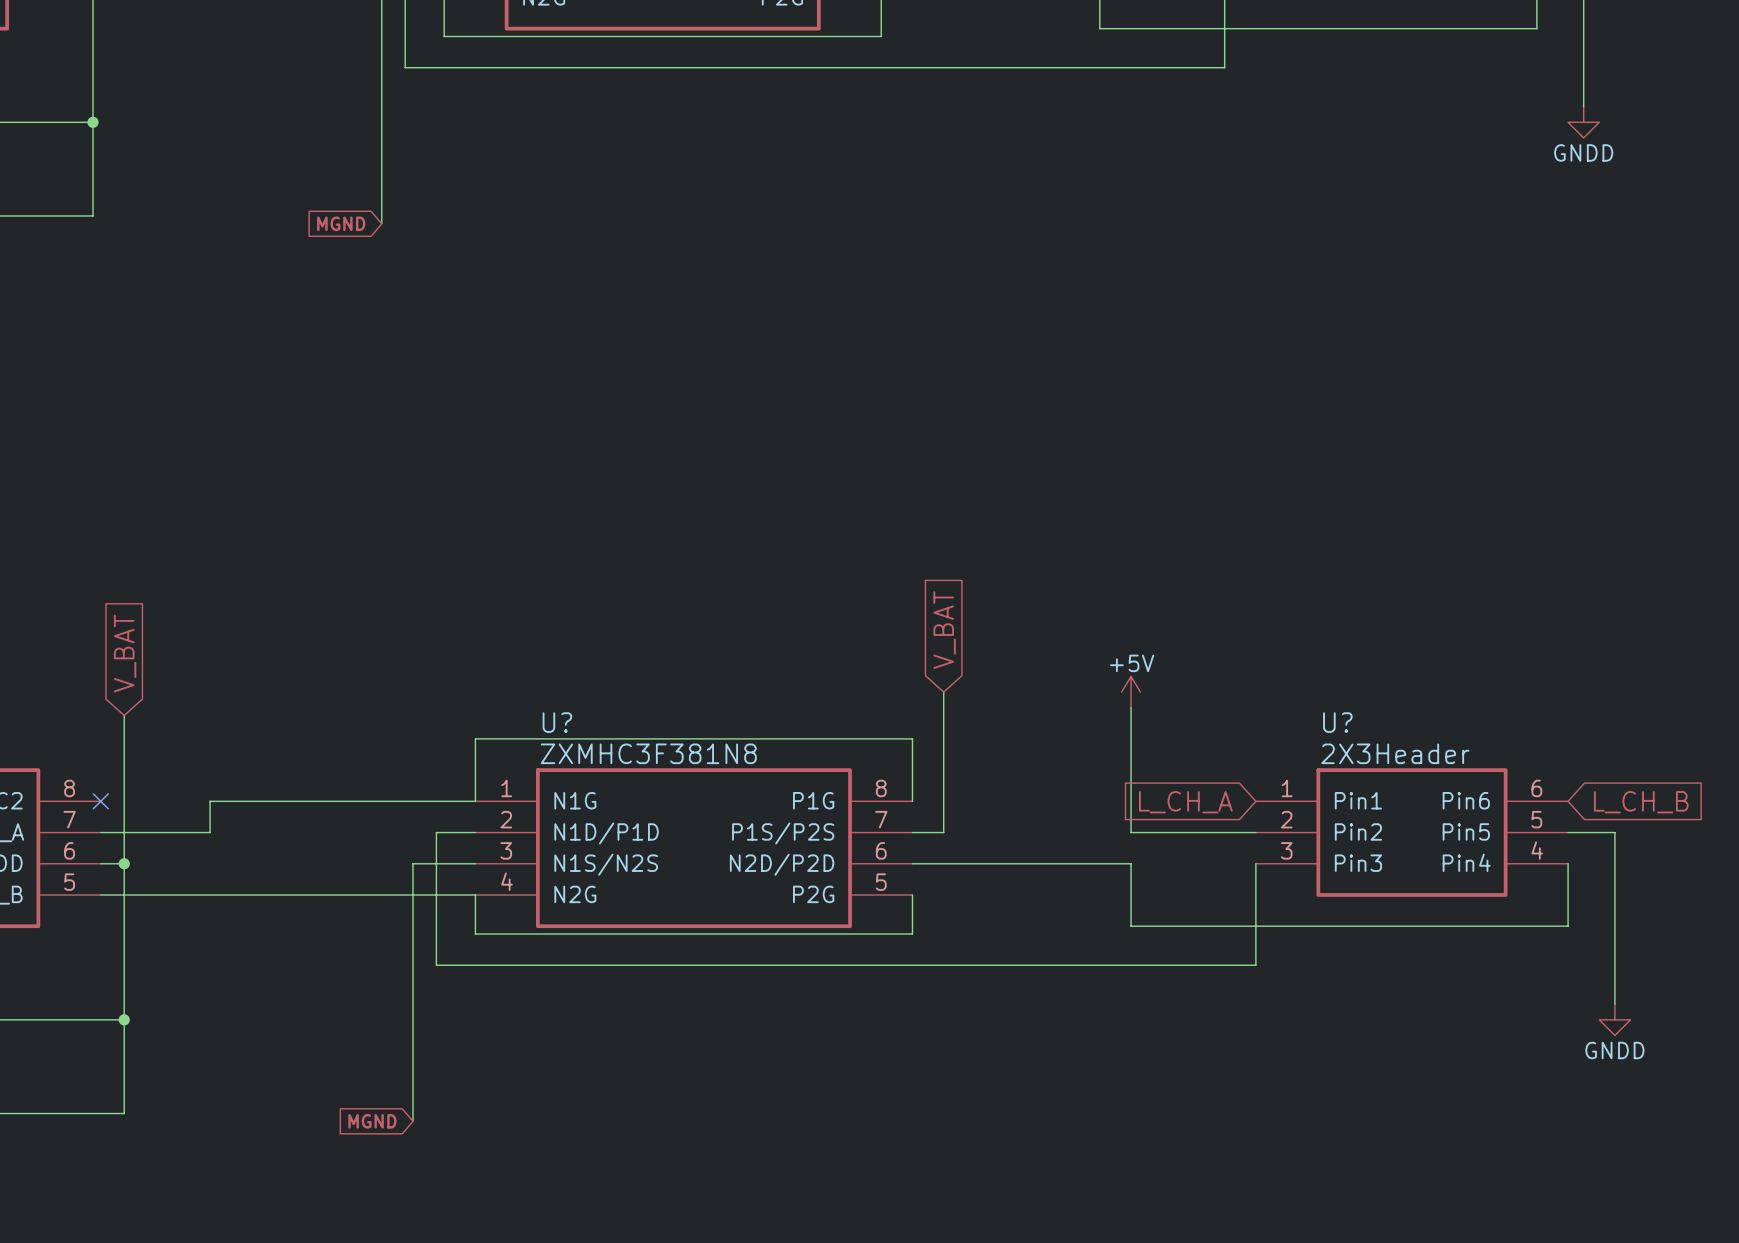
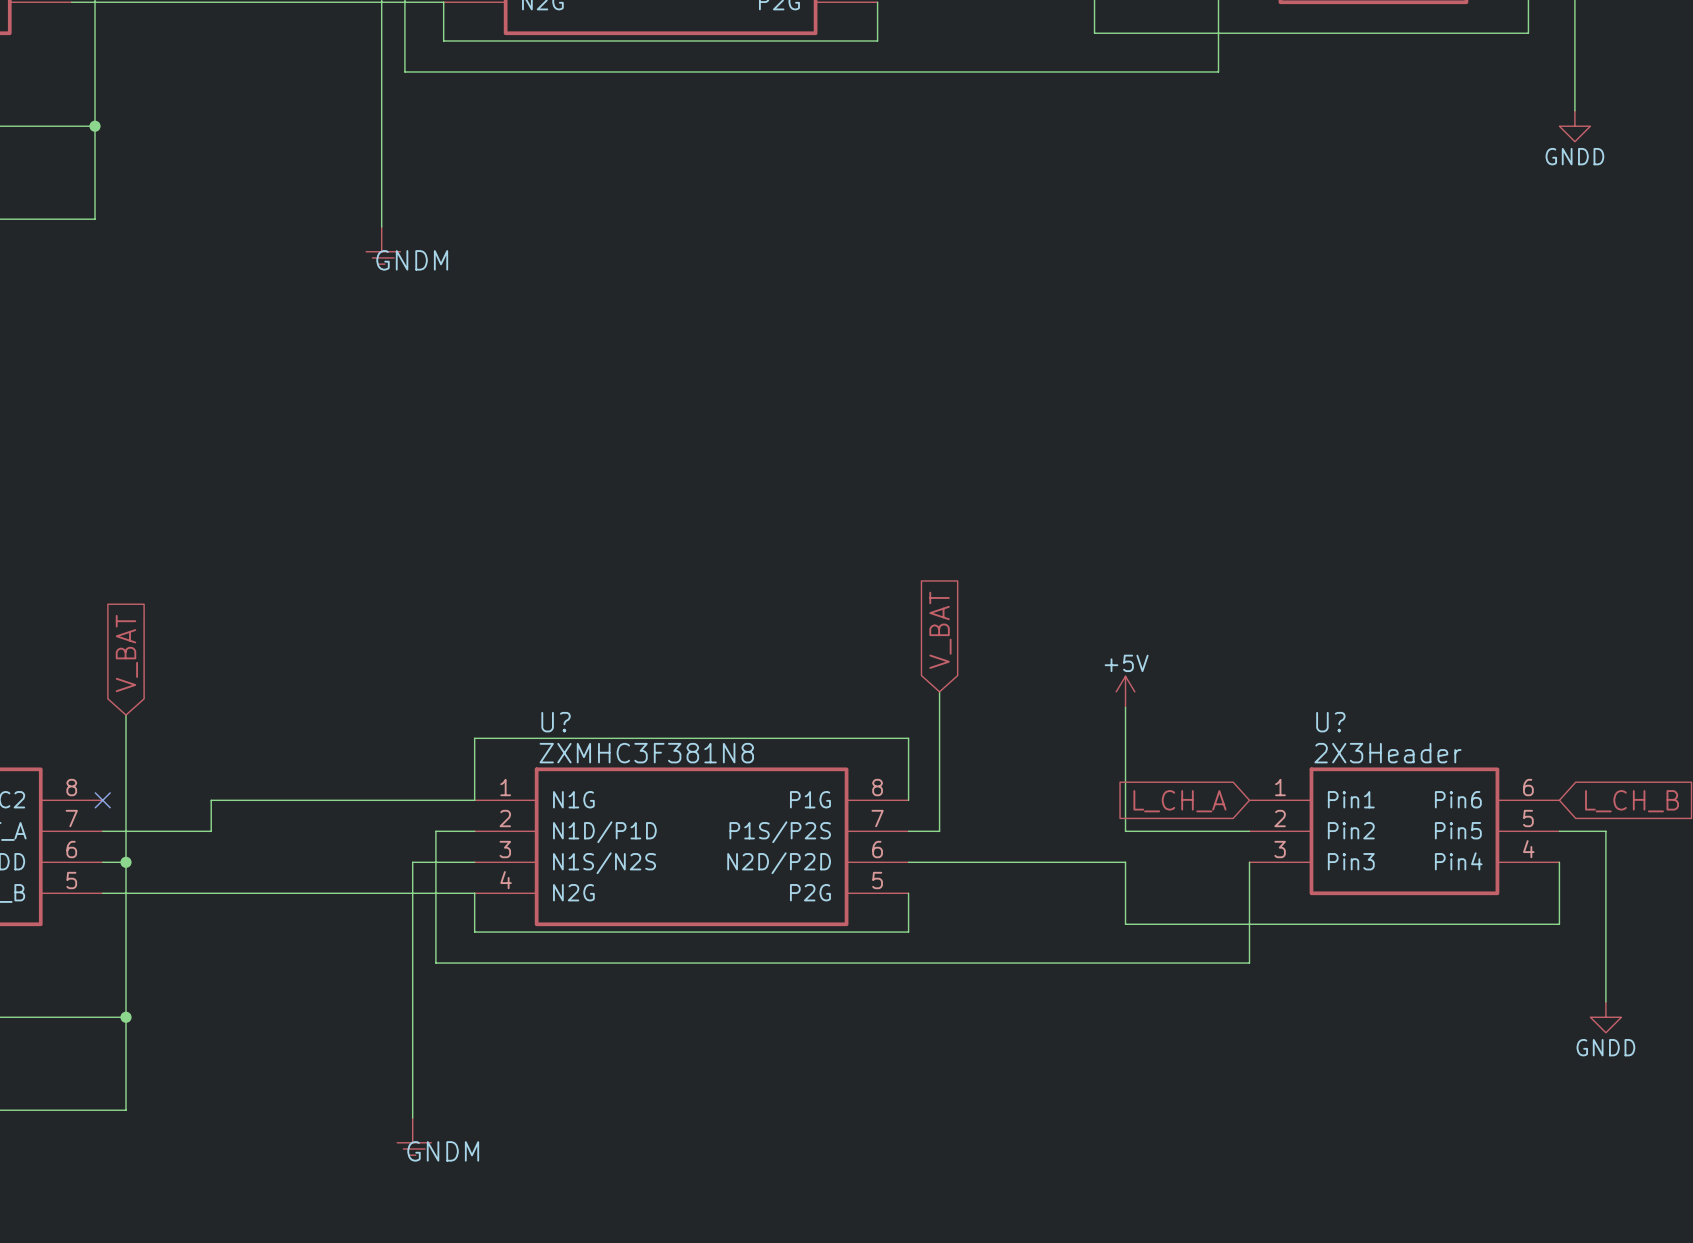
global label: MGND (341, 223) -> none
part: none -> GNDM (383, 245)
global label: MGND (372, 1121) -> none
part: none -> GNDM (414, 1136)

